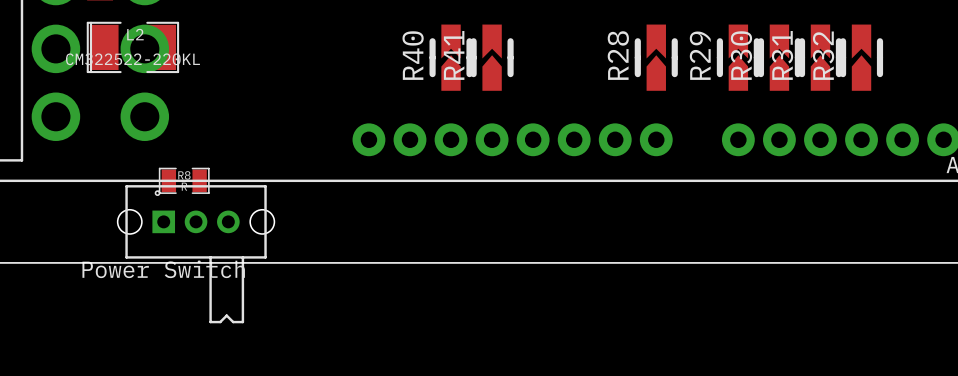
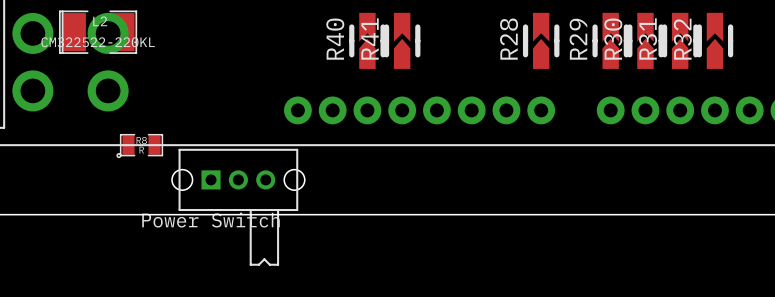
part position: (196, 254) -> (238, 207)

